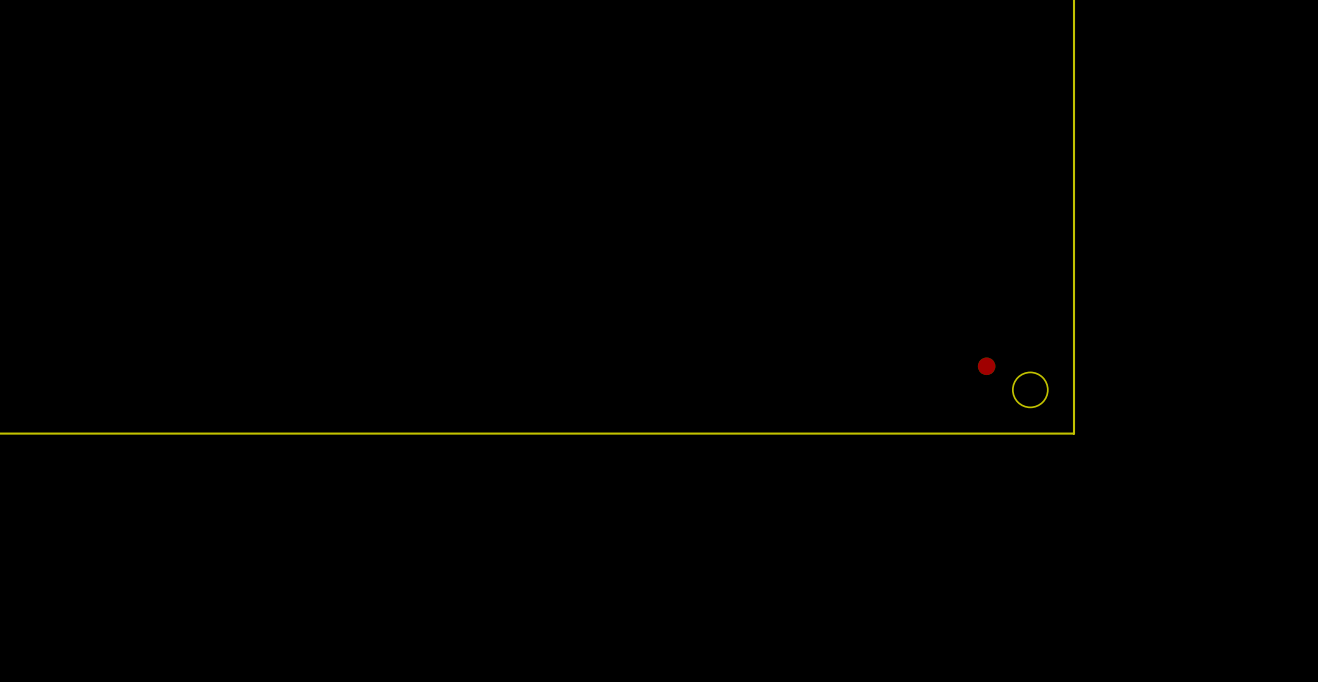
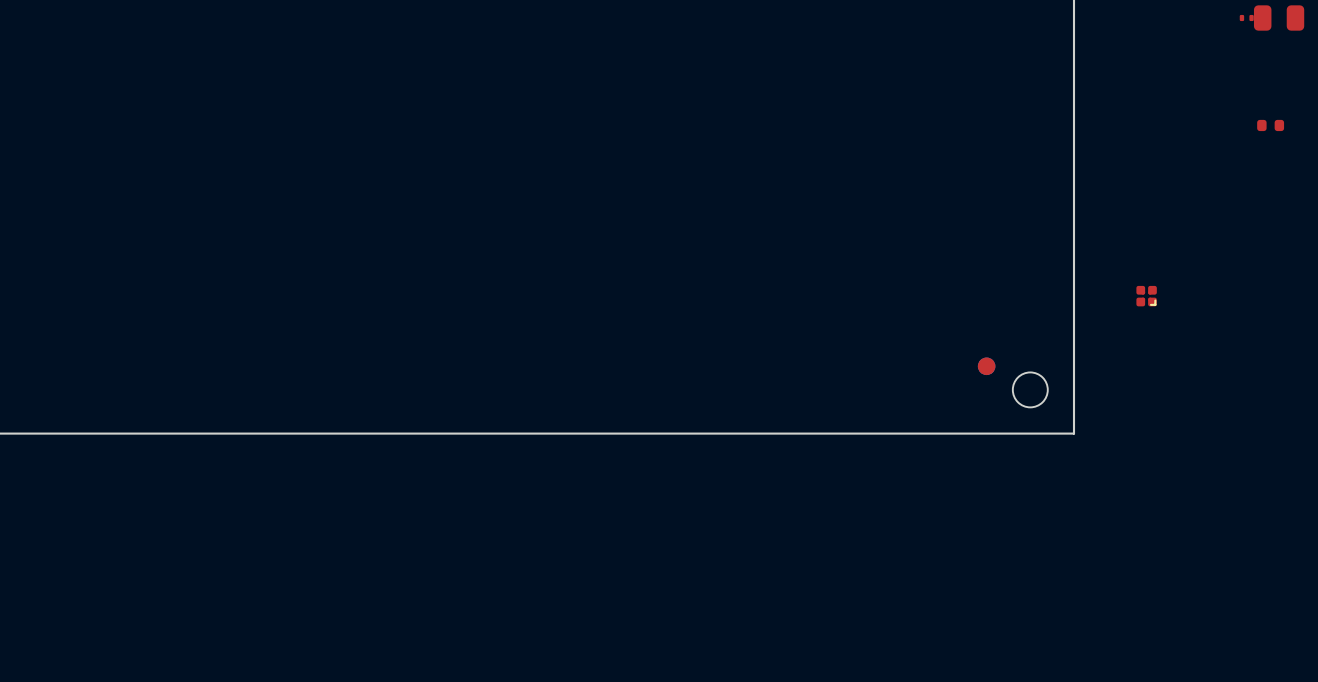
part: none -> (1246, 18)
part: none -> (1279, 18)
part: none -> (1270, 125)
part: none -> (1146, 296)

